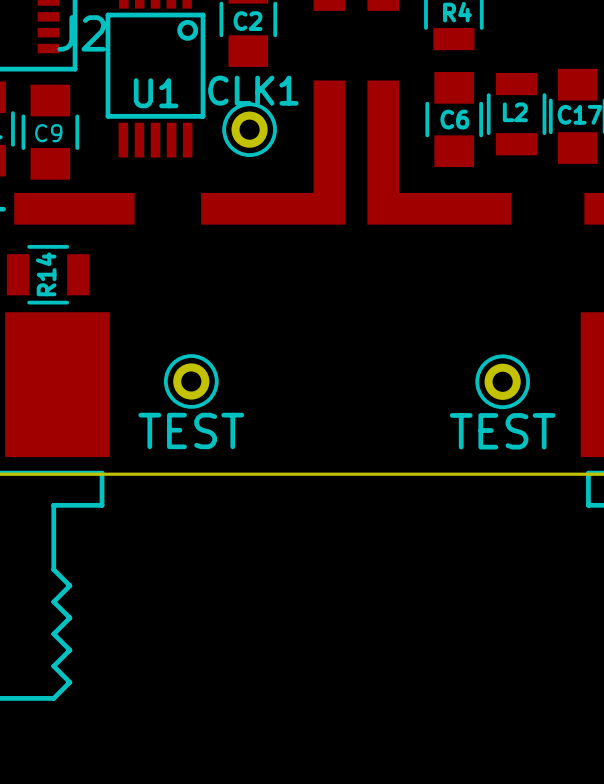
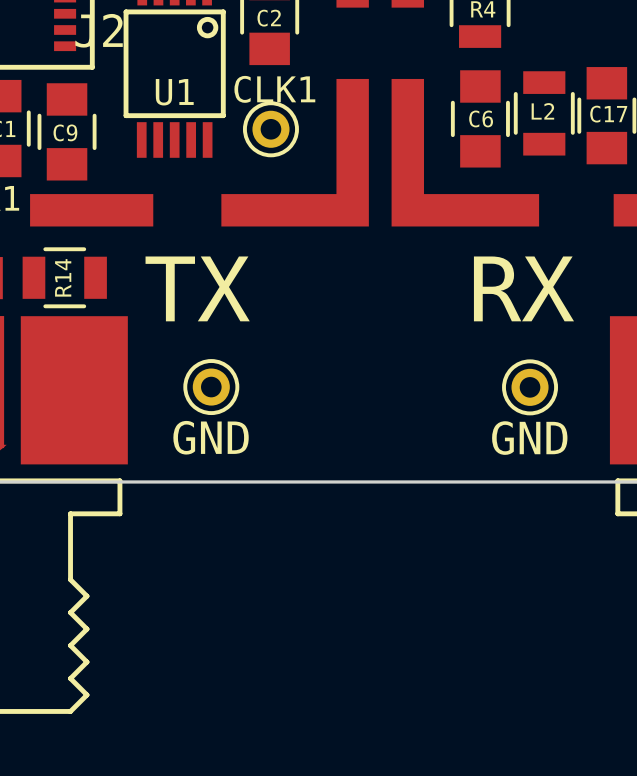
text: none -> TX (197, 288)
text: none -> RX (523, 288)
part value: TEST (191, 430) -> GND (211, 437)
part value: TEST (502, 431) -> GND (529, 438)

